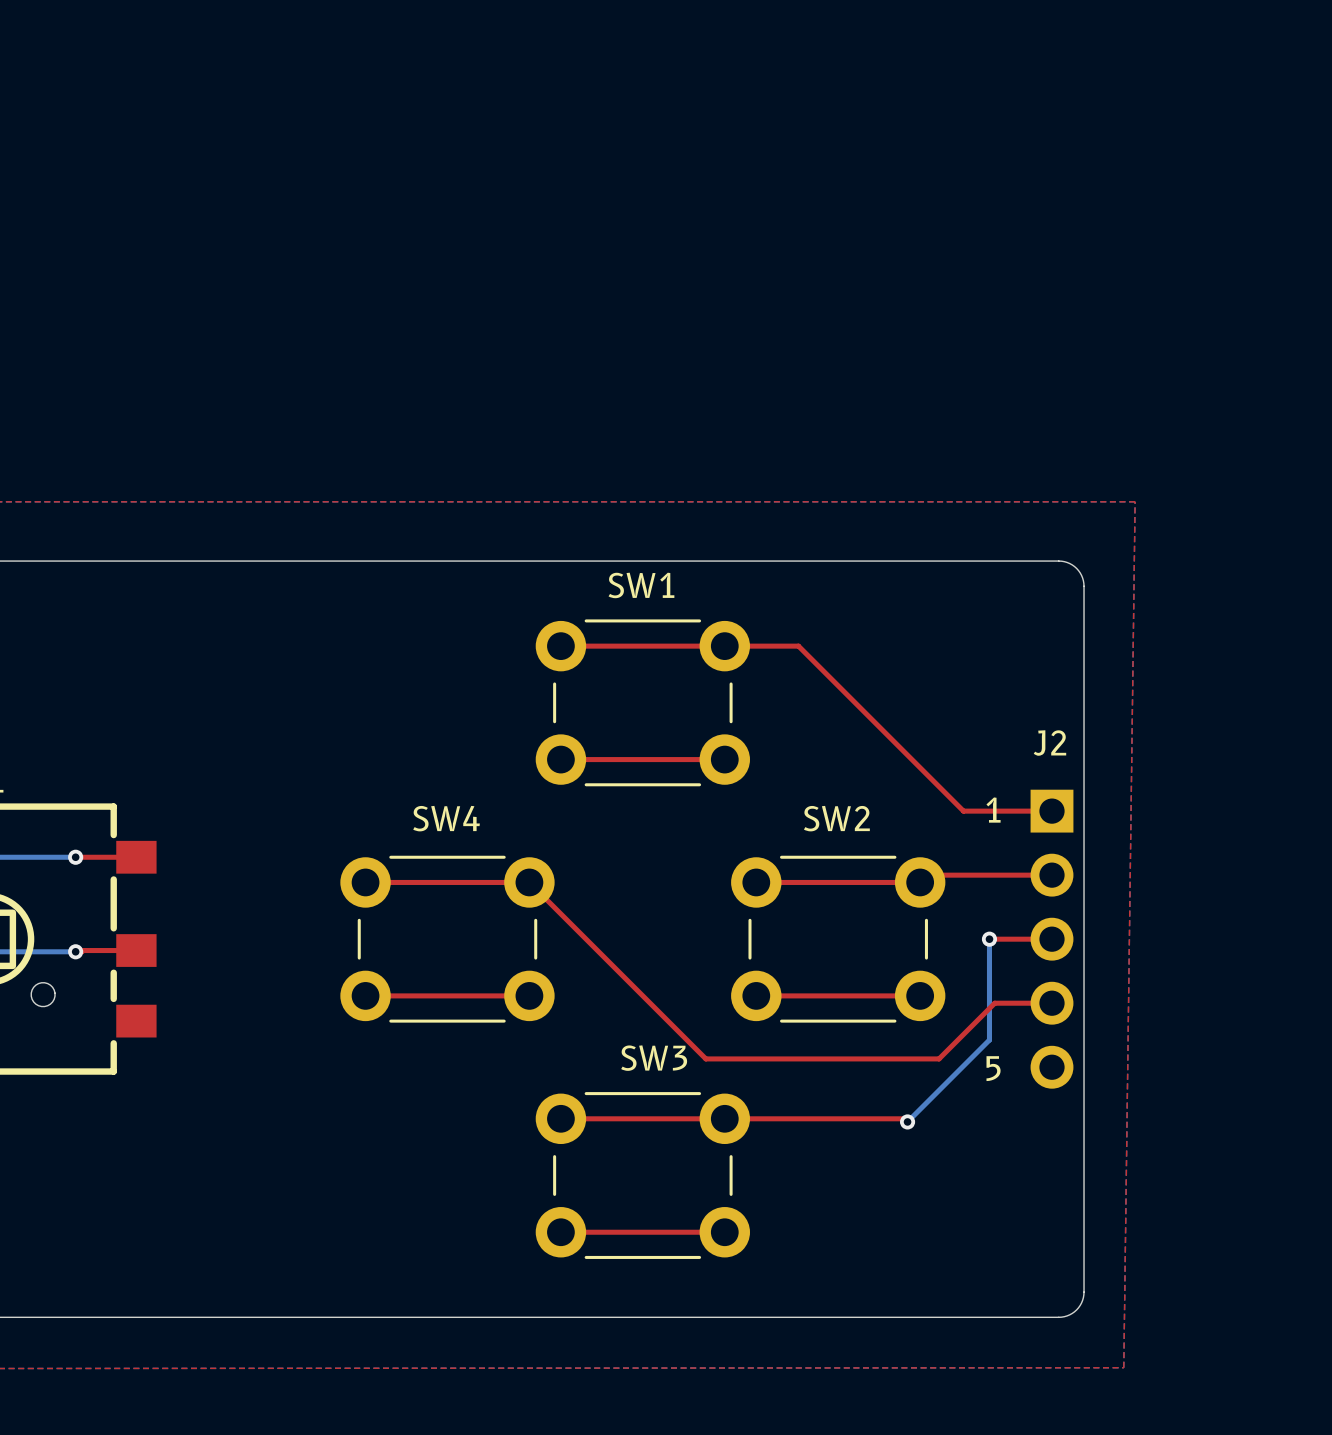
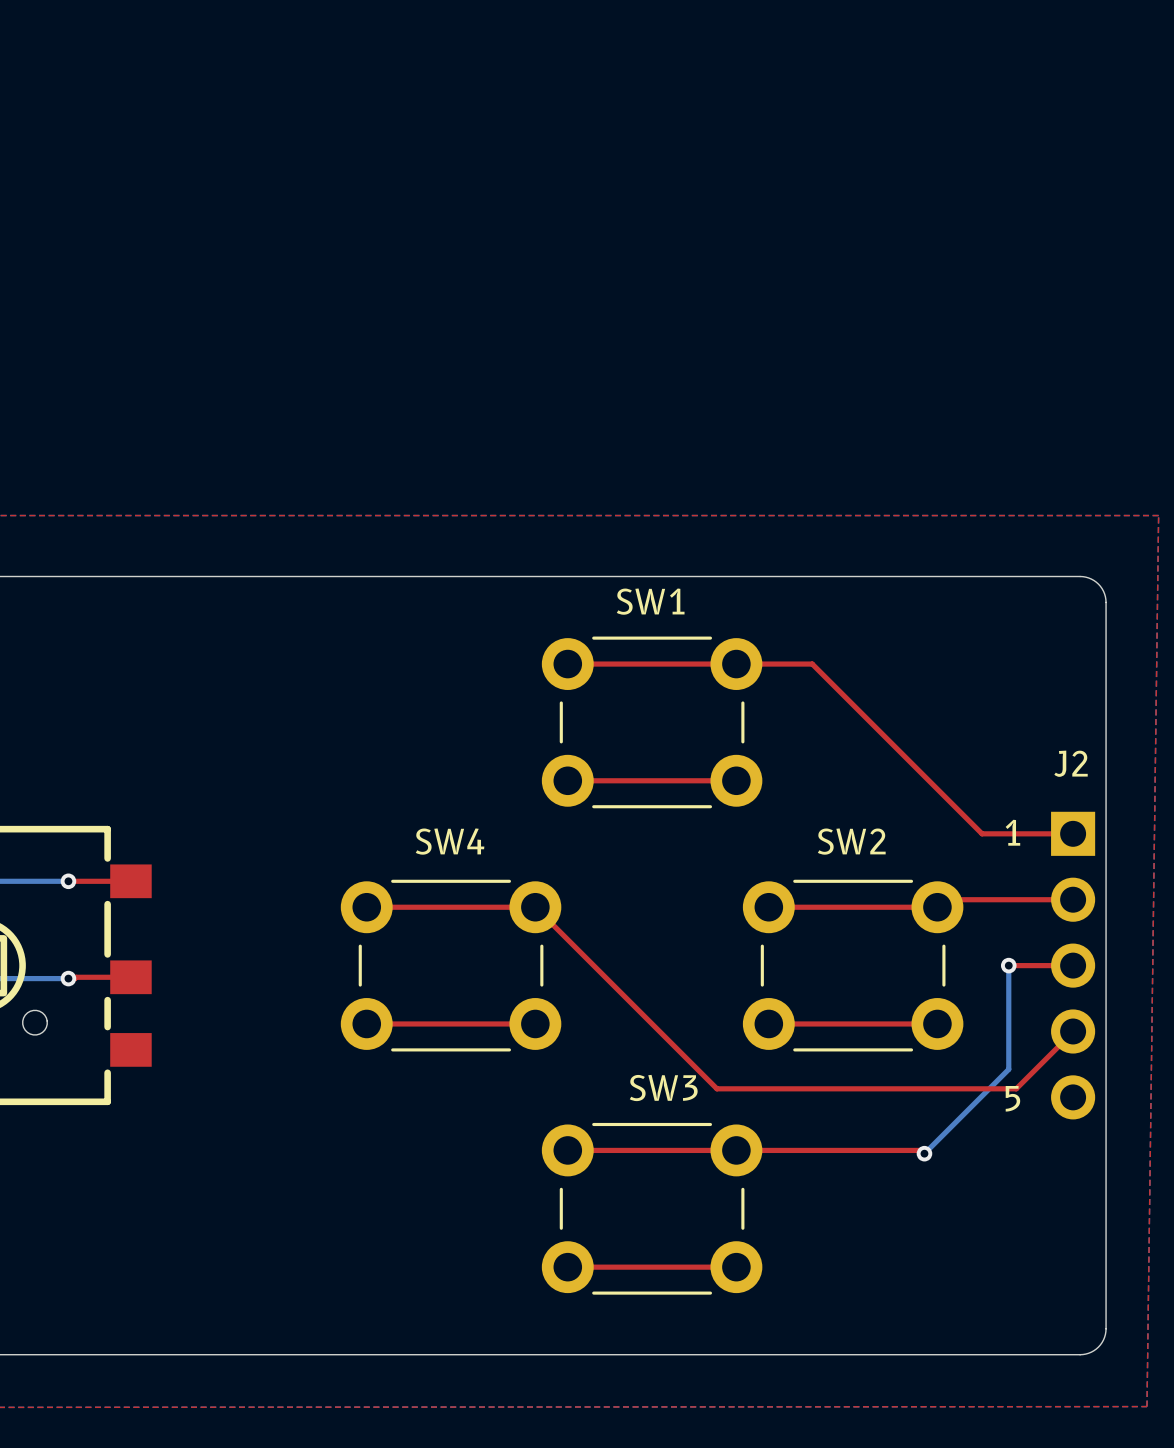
top track: (1052, 1003) (994, 1003) (939, 1058) -> (1073, 1031) (1016, 1088) (956, 1088)

